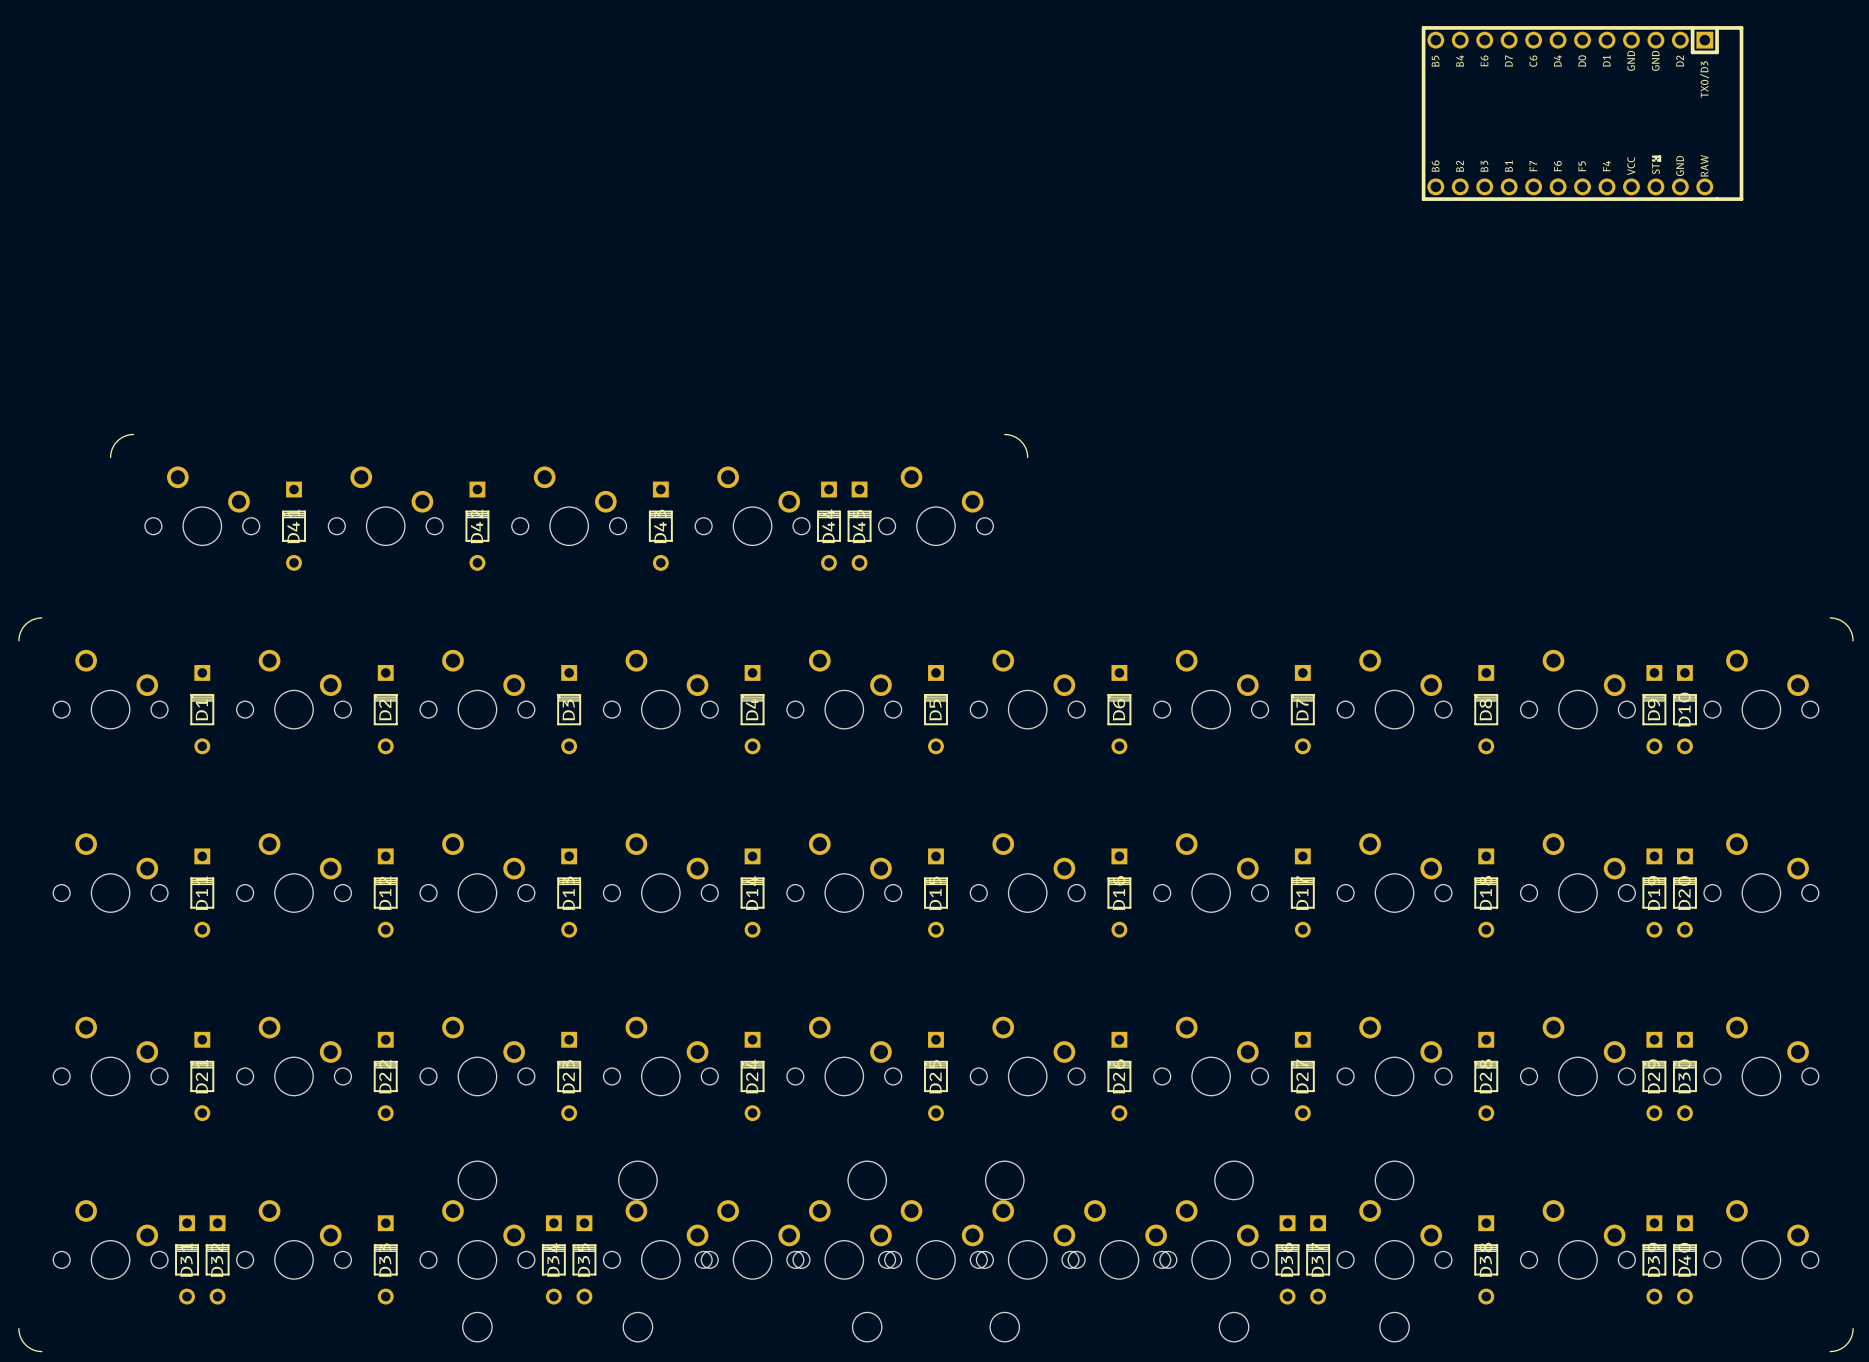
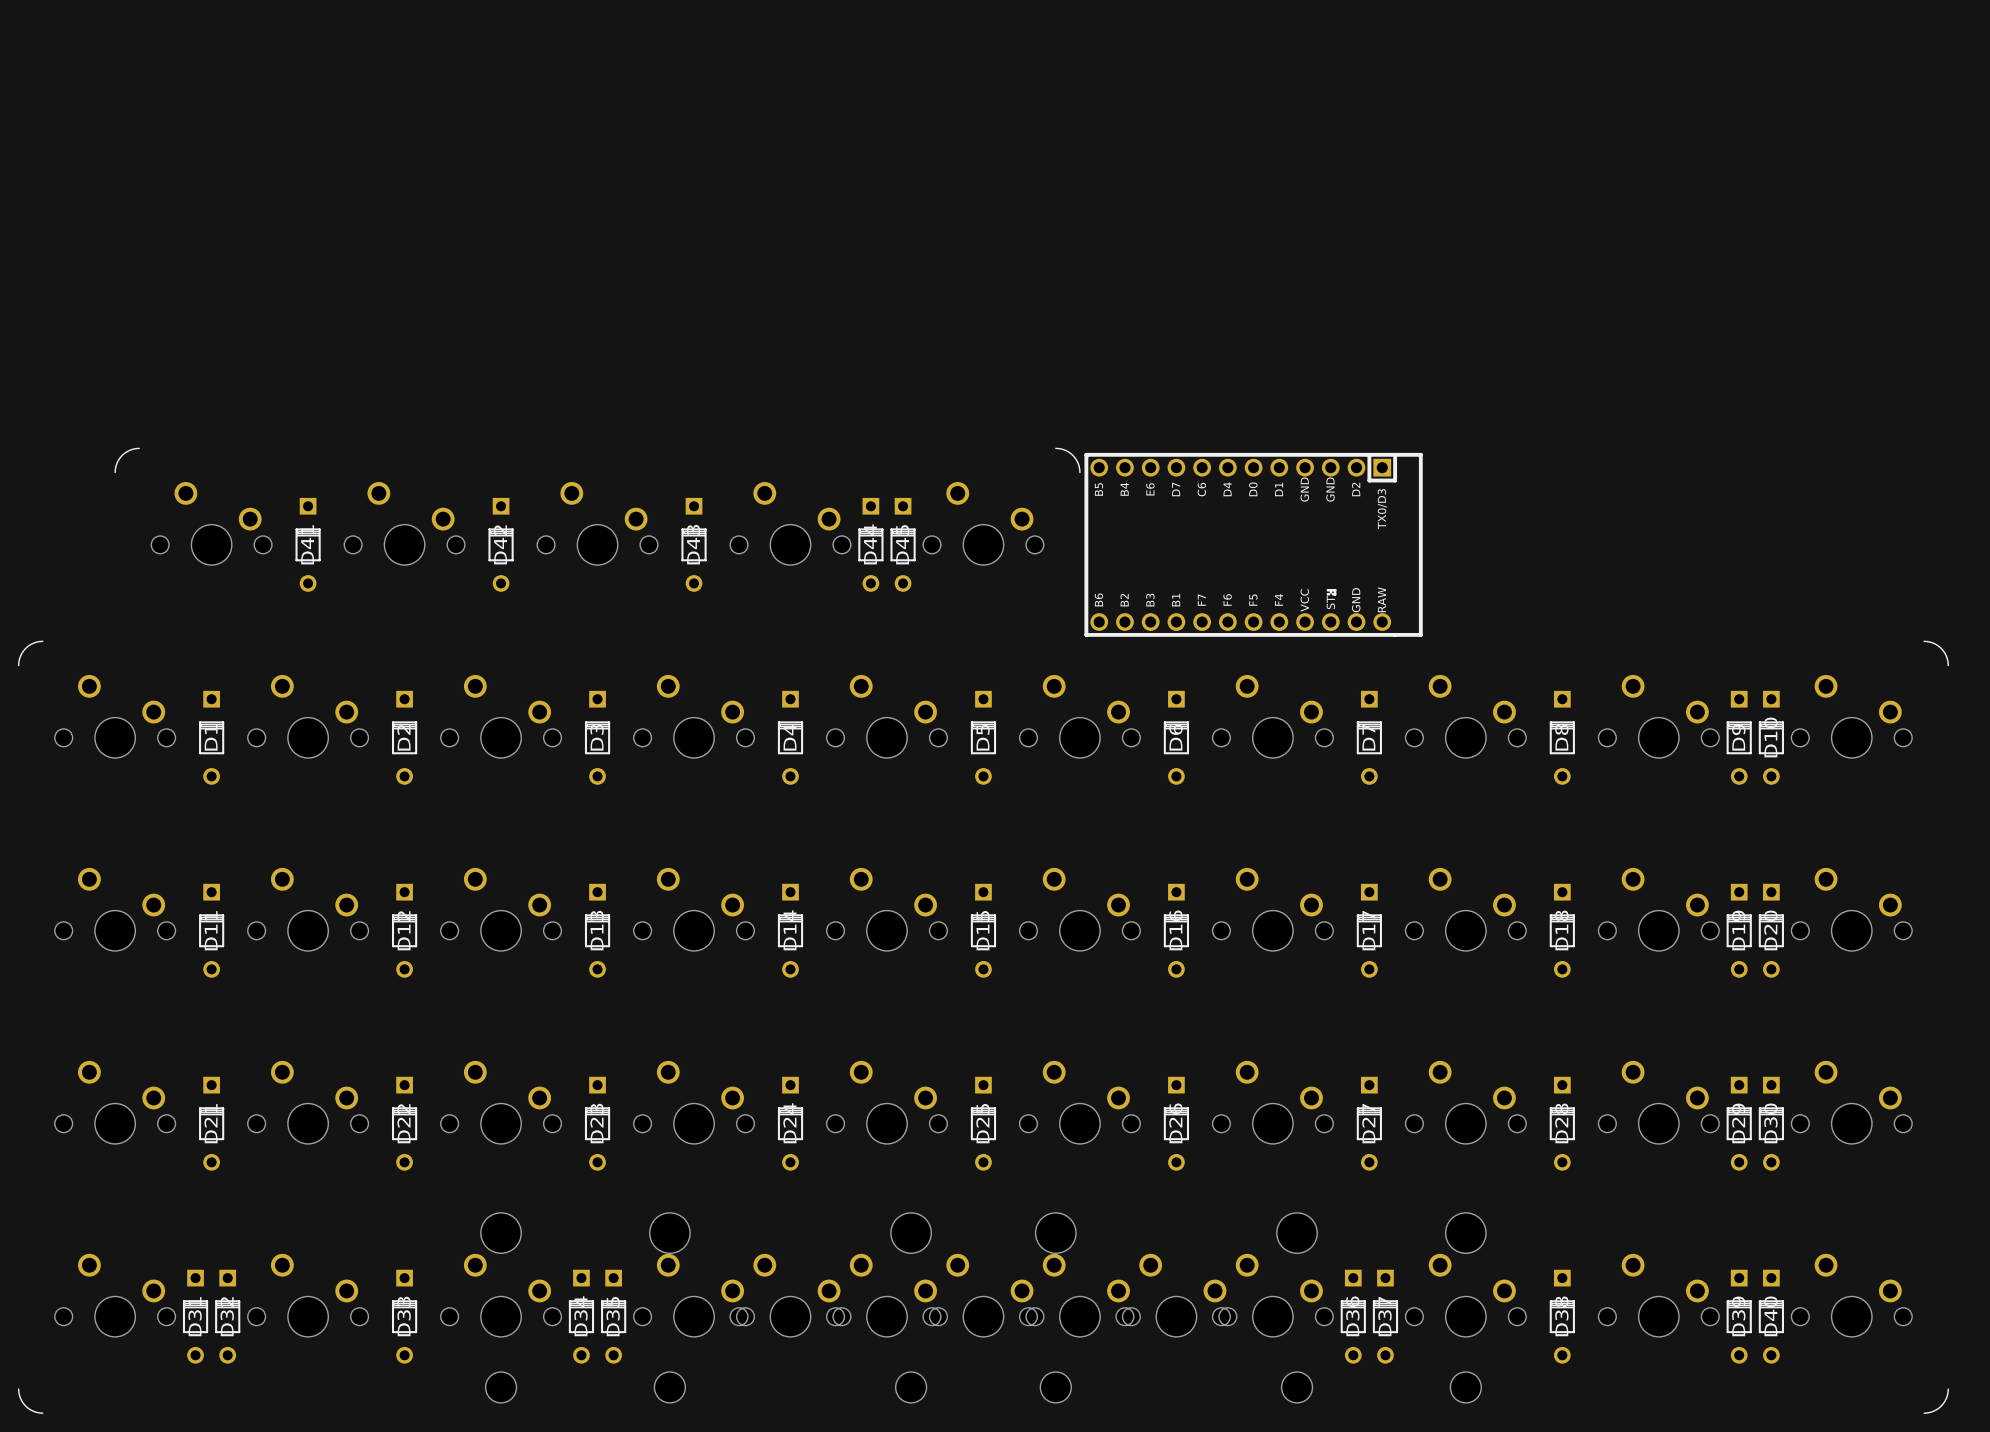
part: (1582, 113) -> none
part: none -> (1253, 544)

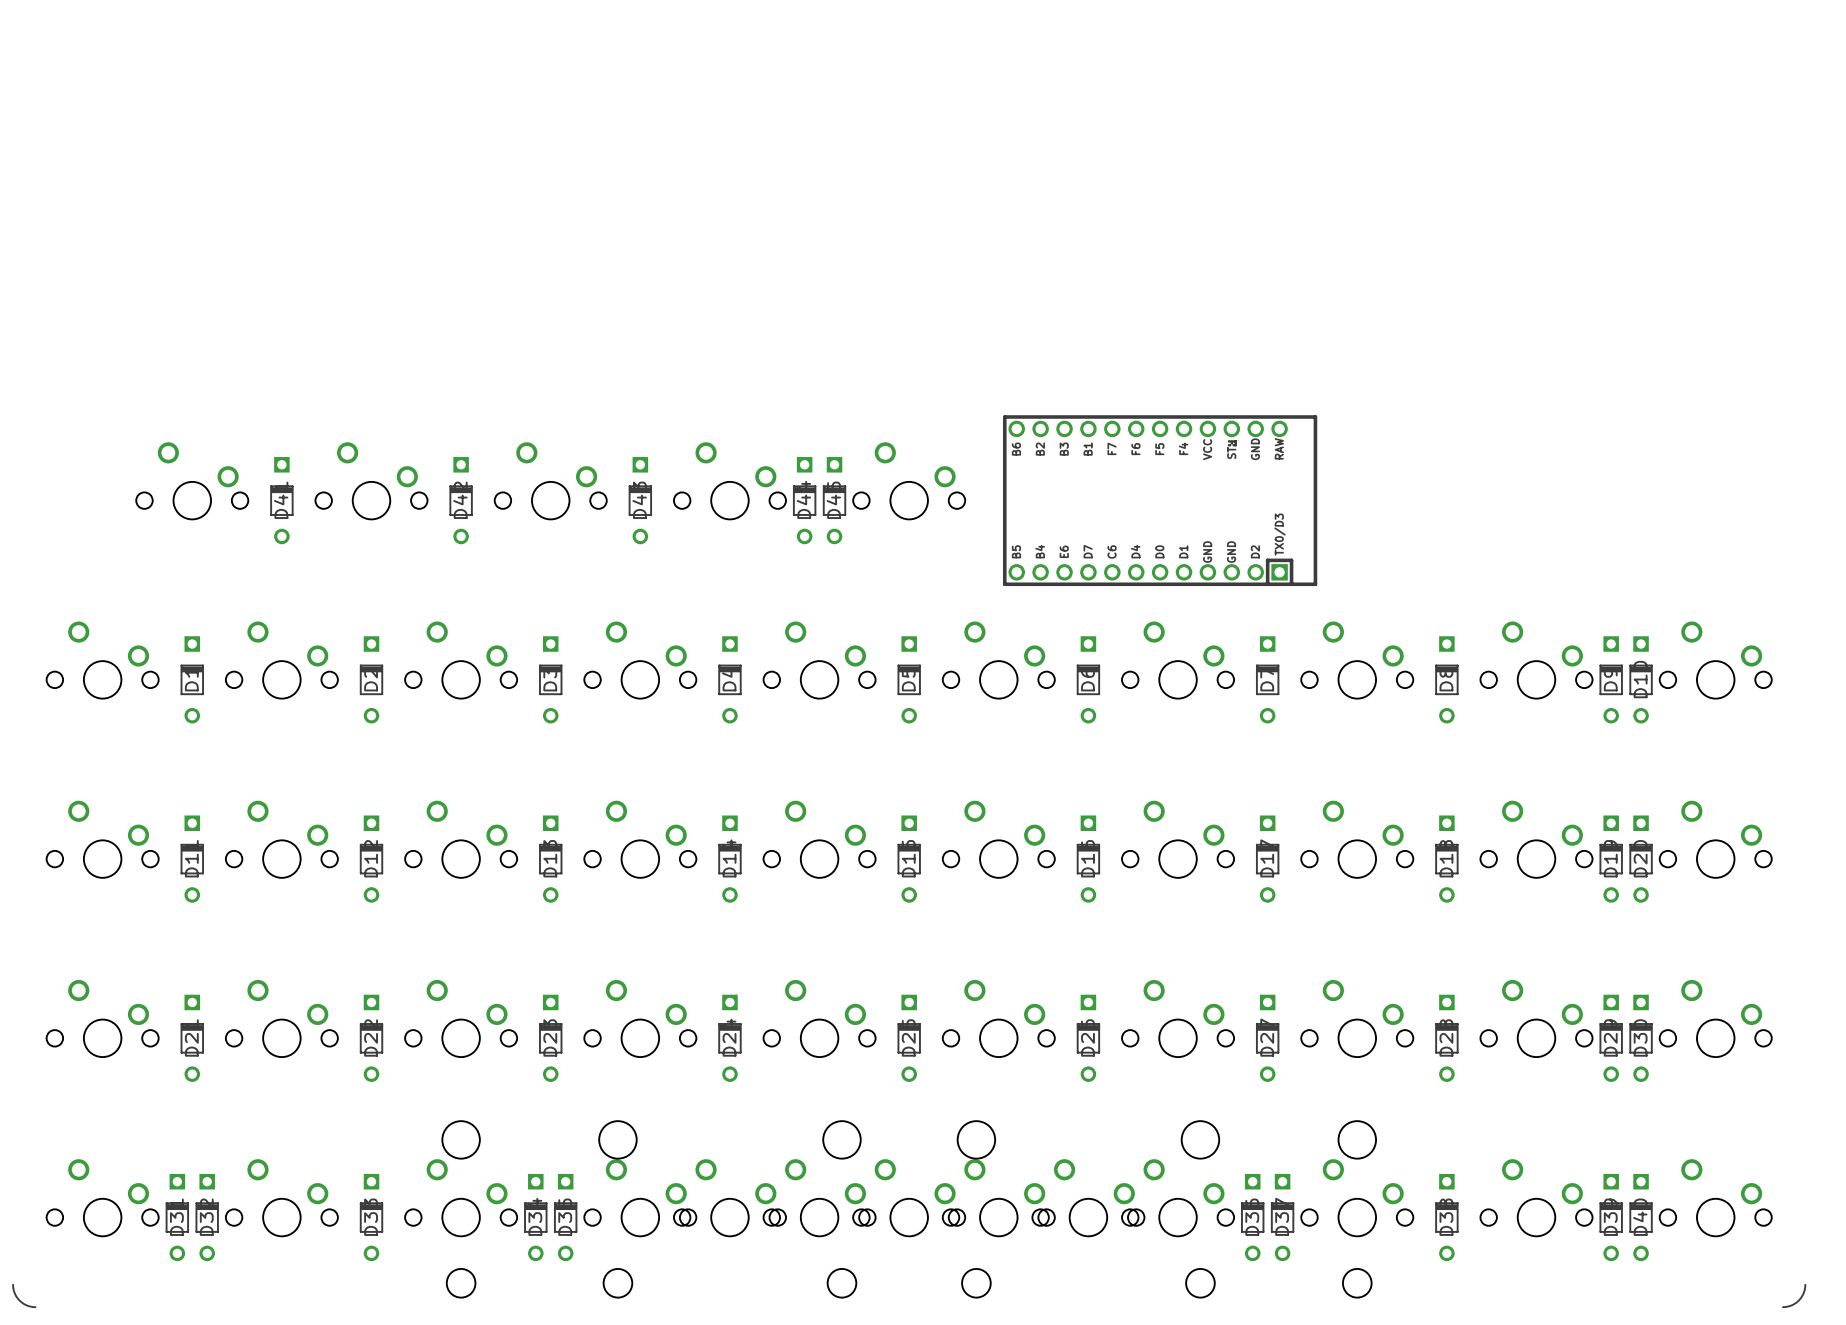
line: (139, 448) (130, 450) (122, 455) (116, 463) (115, 472) -> none
line: (1055, 448) (1065, 450) (1072, 455) (1078, 463) (1079, 472) -> none
part side: top (1253, 544) -> bottom (1160, 500)
line: (42, 641) (33, 643) (25, 648) (20, 656) (18, 665) -> none
line: (1924, 641) (1933, 643) (1941, 648) (1946, 656) (1948, 665) -> none

